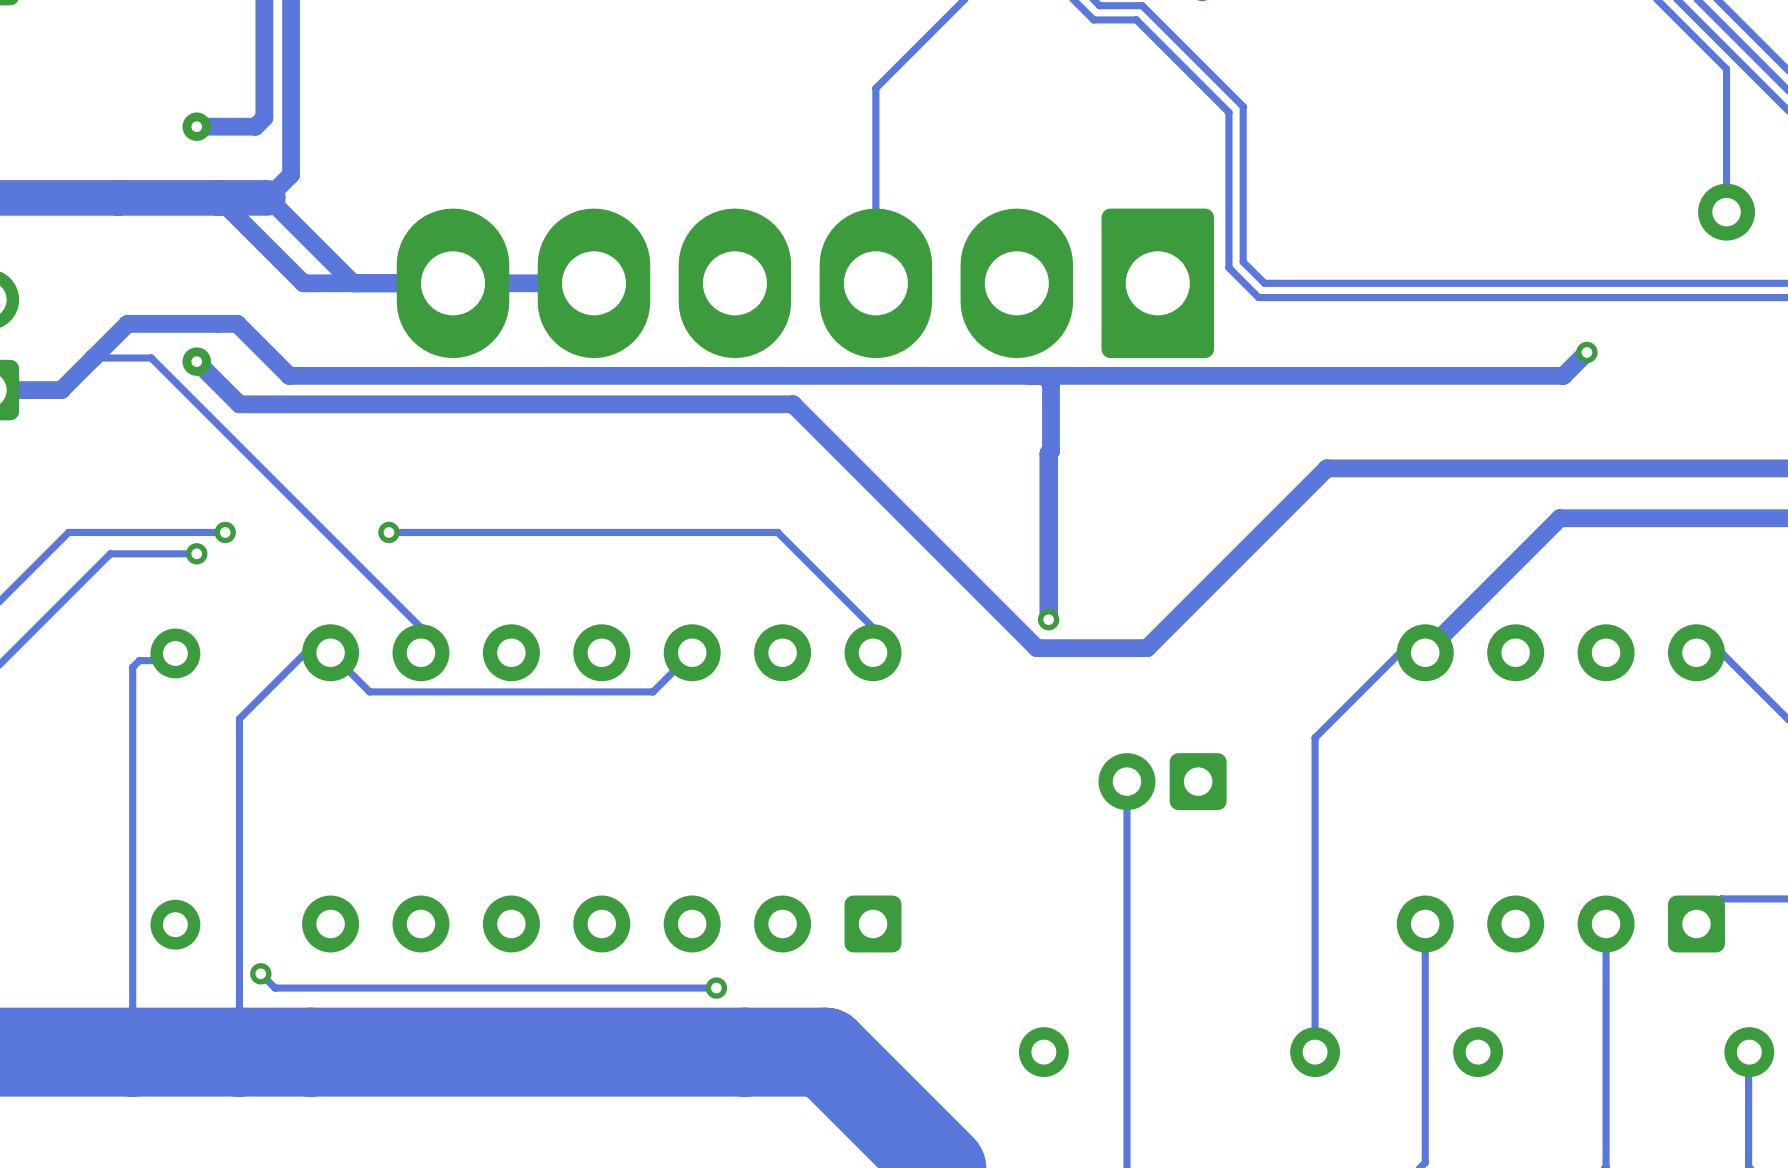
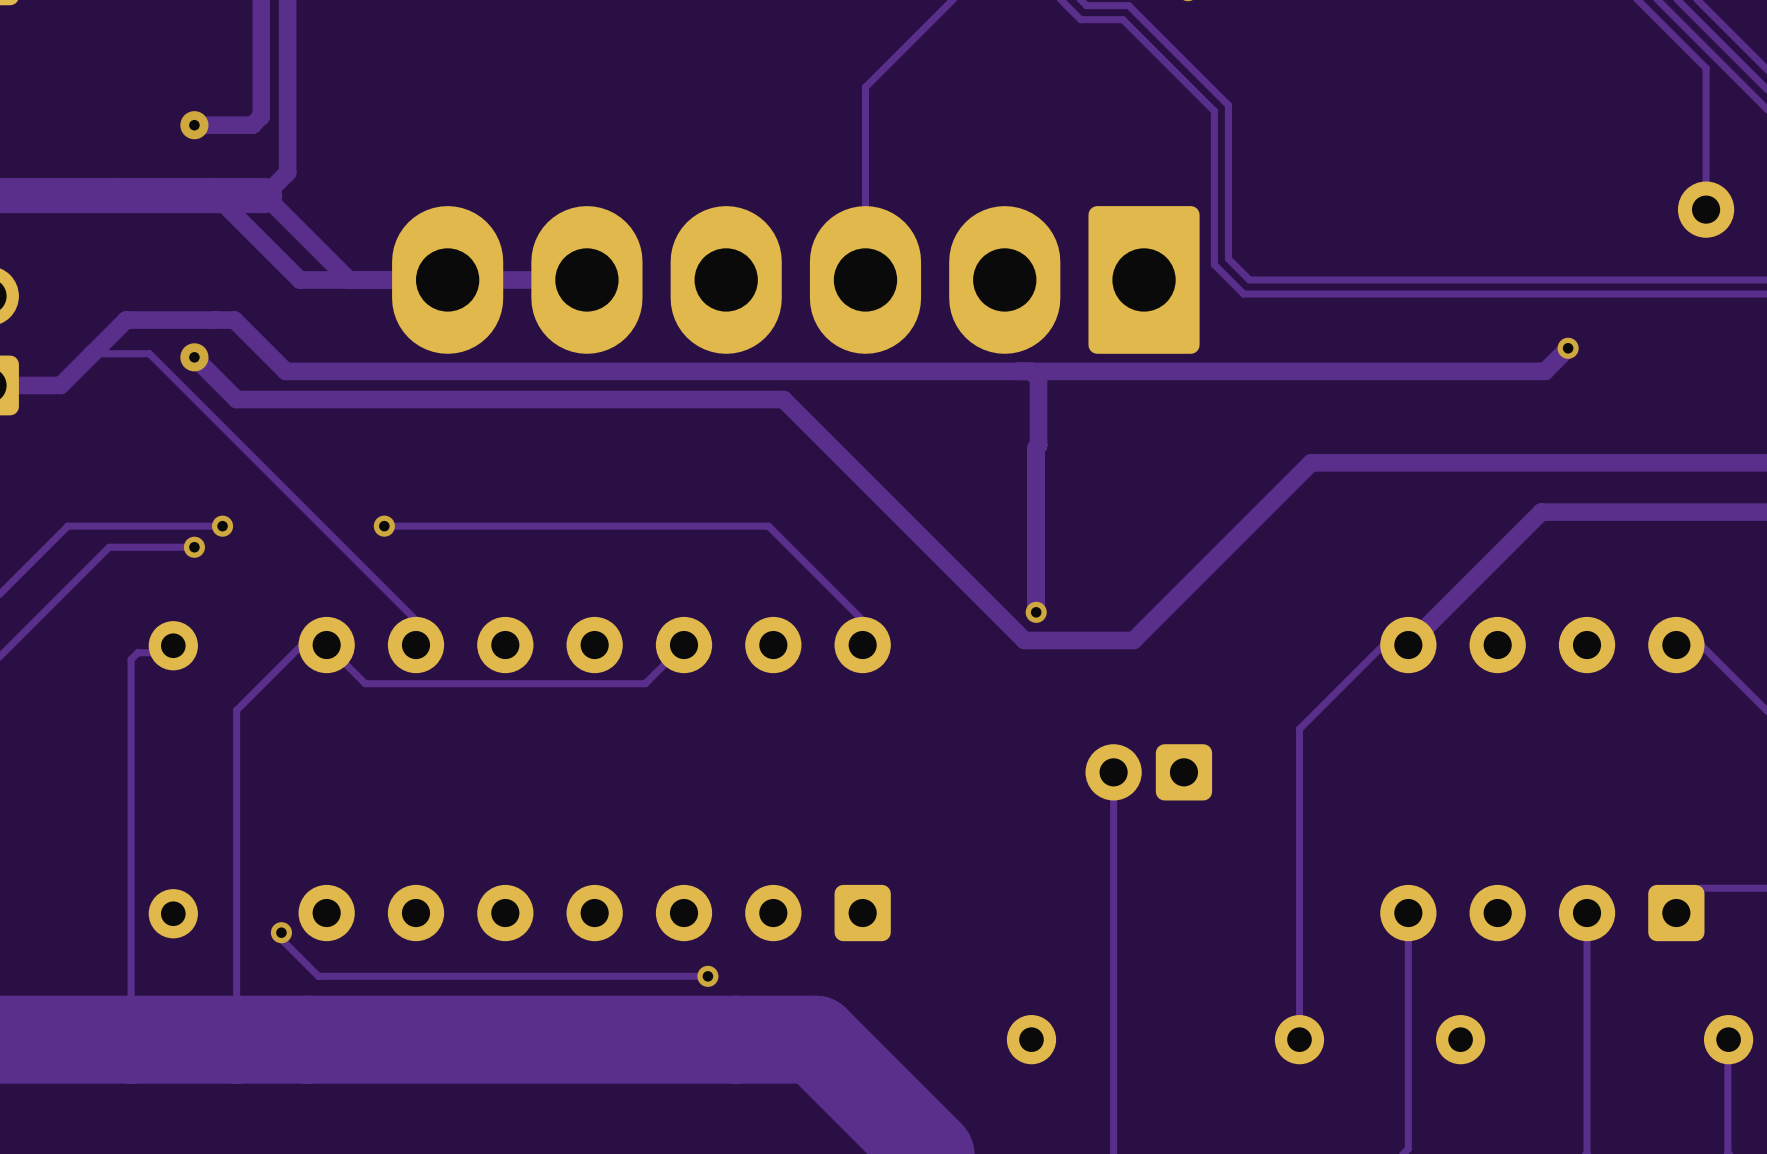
track: (260, 973) (275, 988) (322, 988) -> (281, 932) (281, 939) (318, 976)
via position: (260, 973) -> (281, 932)

